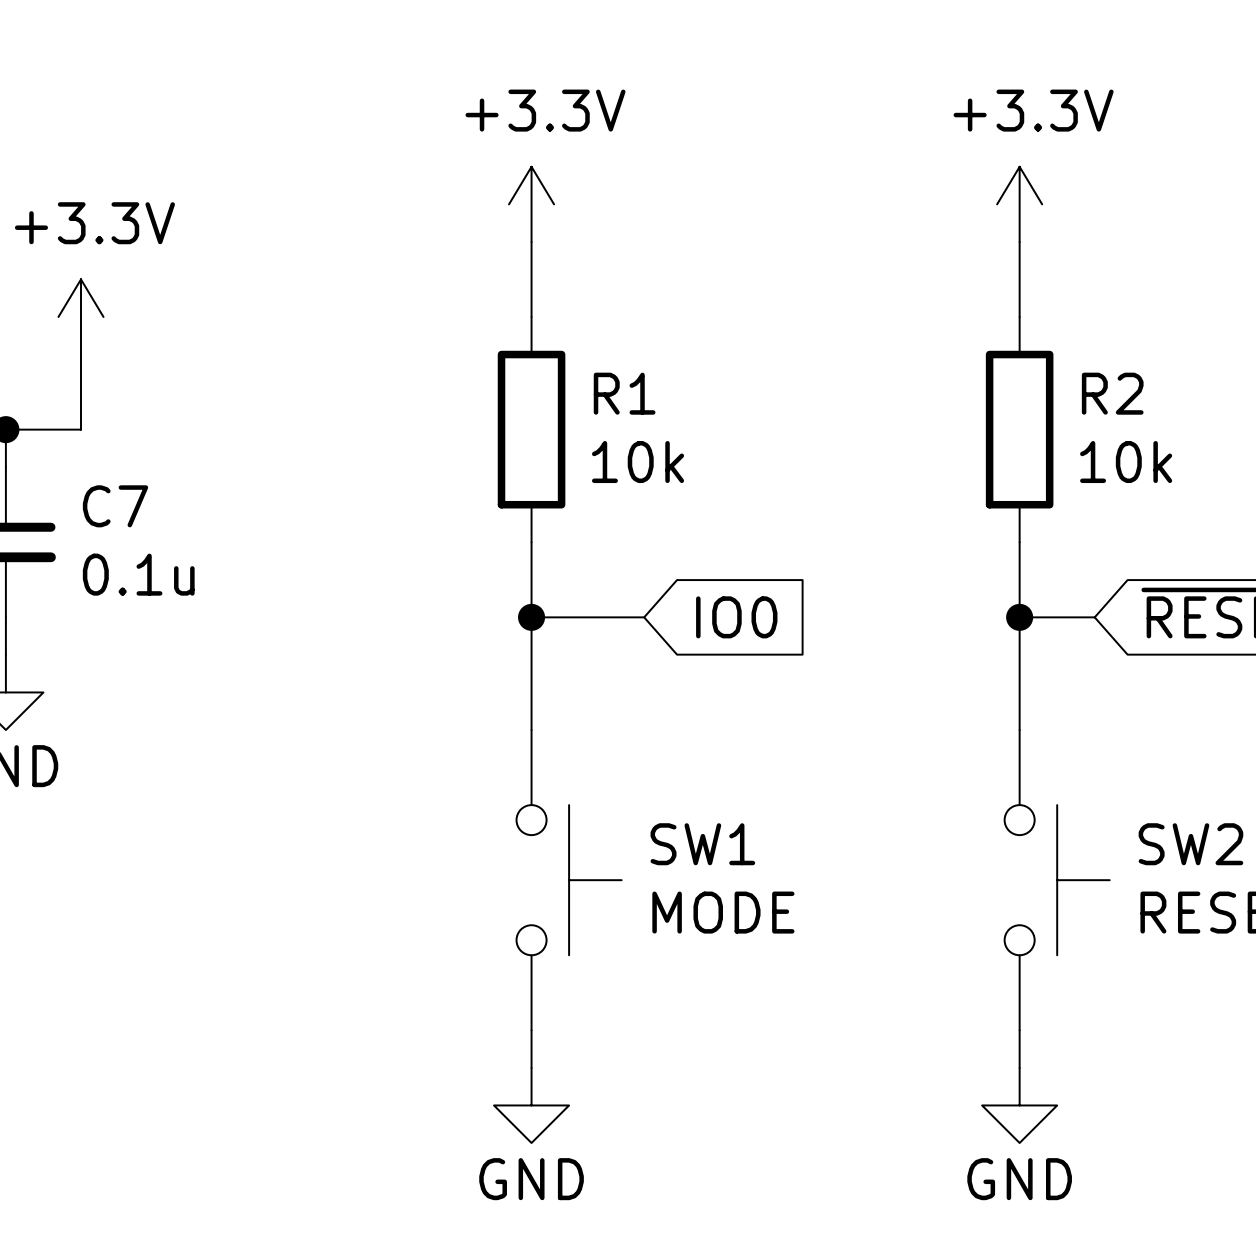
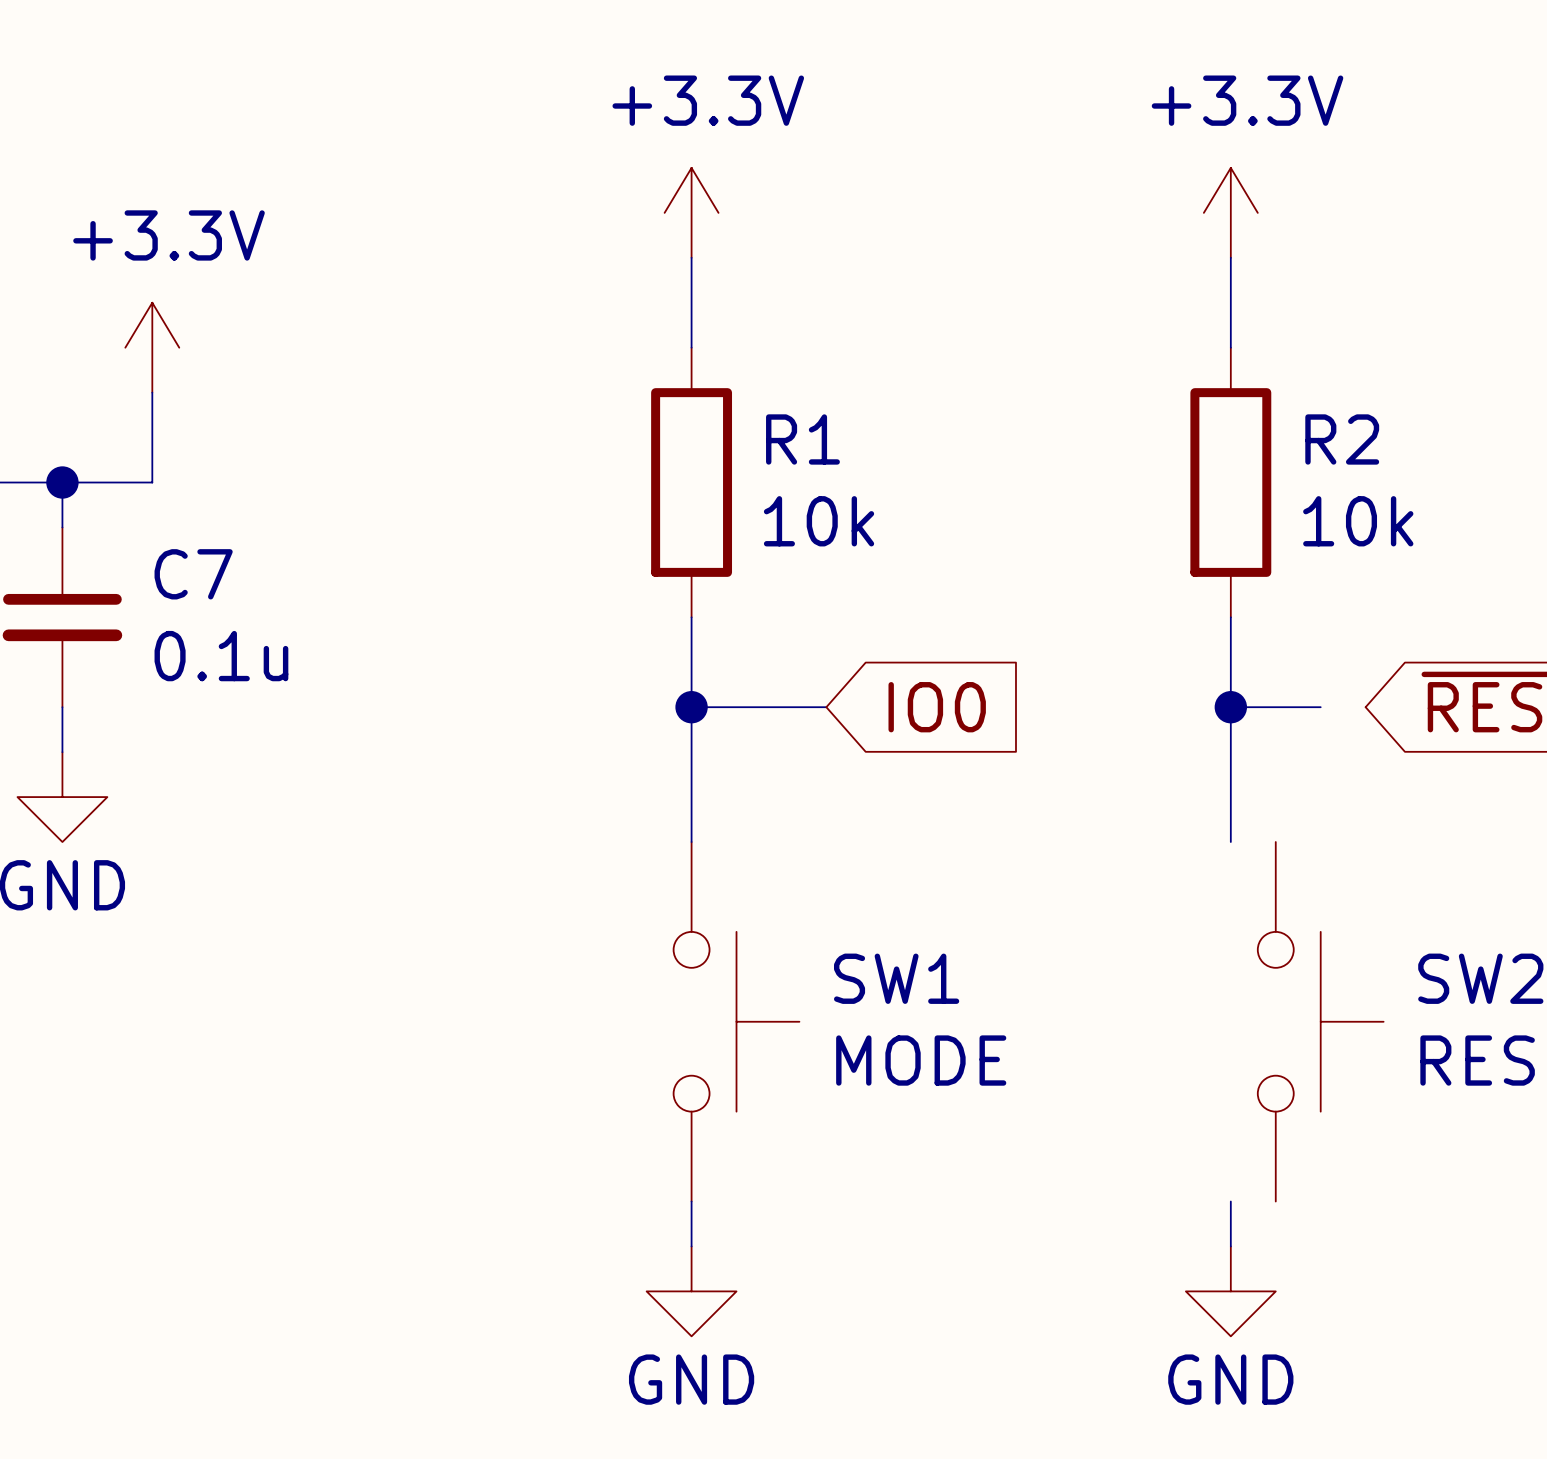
power symbol position: +3.3V (1019, 204) -> +3.3V (1230, 212)
wire: (1019, 241) (1019, 316) -> (1230, 257) (1230, 347)
R2 position: (1019, 429) -> (1230, 482)
wire: (1019, 542) (1019, 729) -> (1230, 617) (1230, 842)
junction position: (1019, 617) -> (1230, 707)
wire: (1057, 617) (1094, 617) -> (1230, 707) (1275, 707)
wire: (1019, 1030) (1019, 1067) -> (1230, 1201) (1230, 1246)
power symbol position: GND (1019, 1105) -> GND (1230, 1291)

